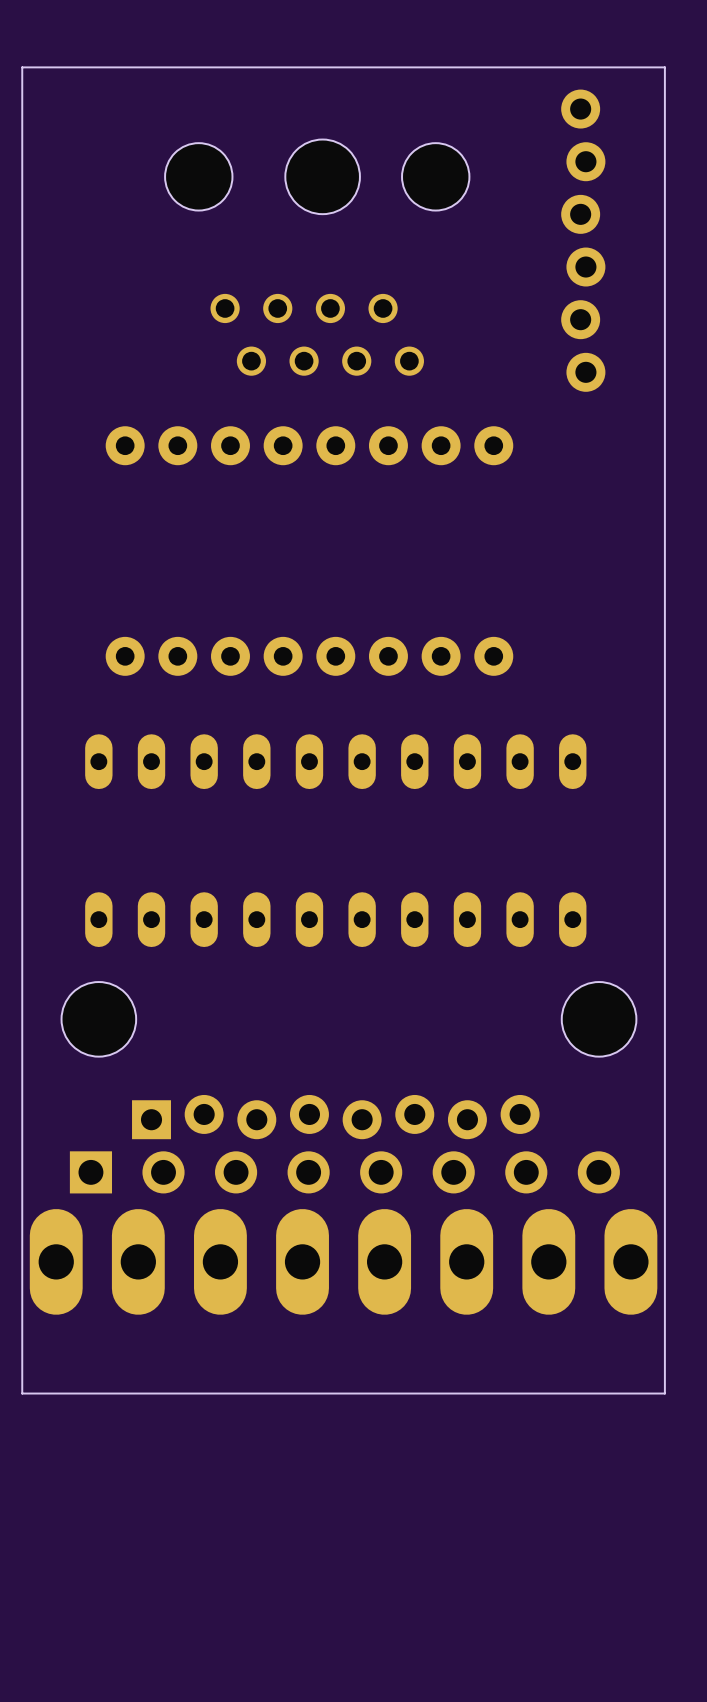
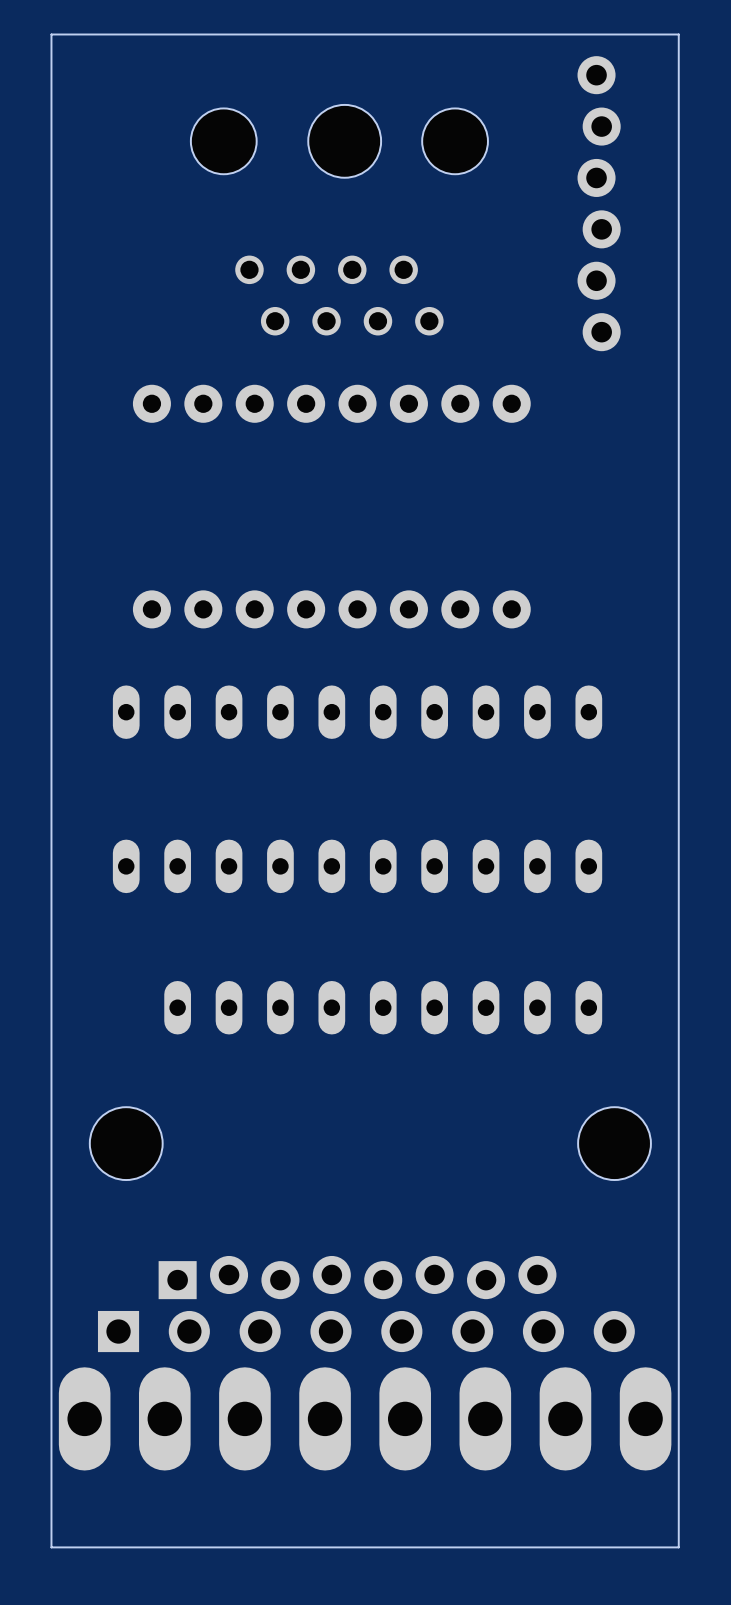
part position: (98, 1019) -> (126, 1143)
part position: (599, 1019) -> (614, 1143)
part: none -> (383, 1007)
part position: (335, 1117) -> (357, 1277)
part position: (344, 1172) -> (366, 1331)
part position: (343, 1261) -> (365, 1418)
board edge: (664, 1393) (22, 1393) -> (678, 1328) (678, 1547) (51, 1547) (51, 1328)

